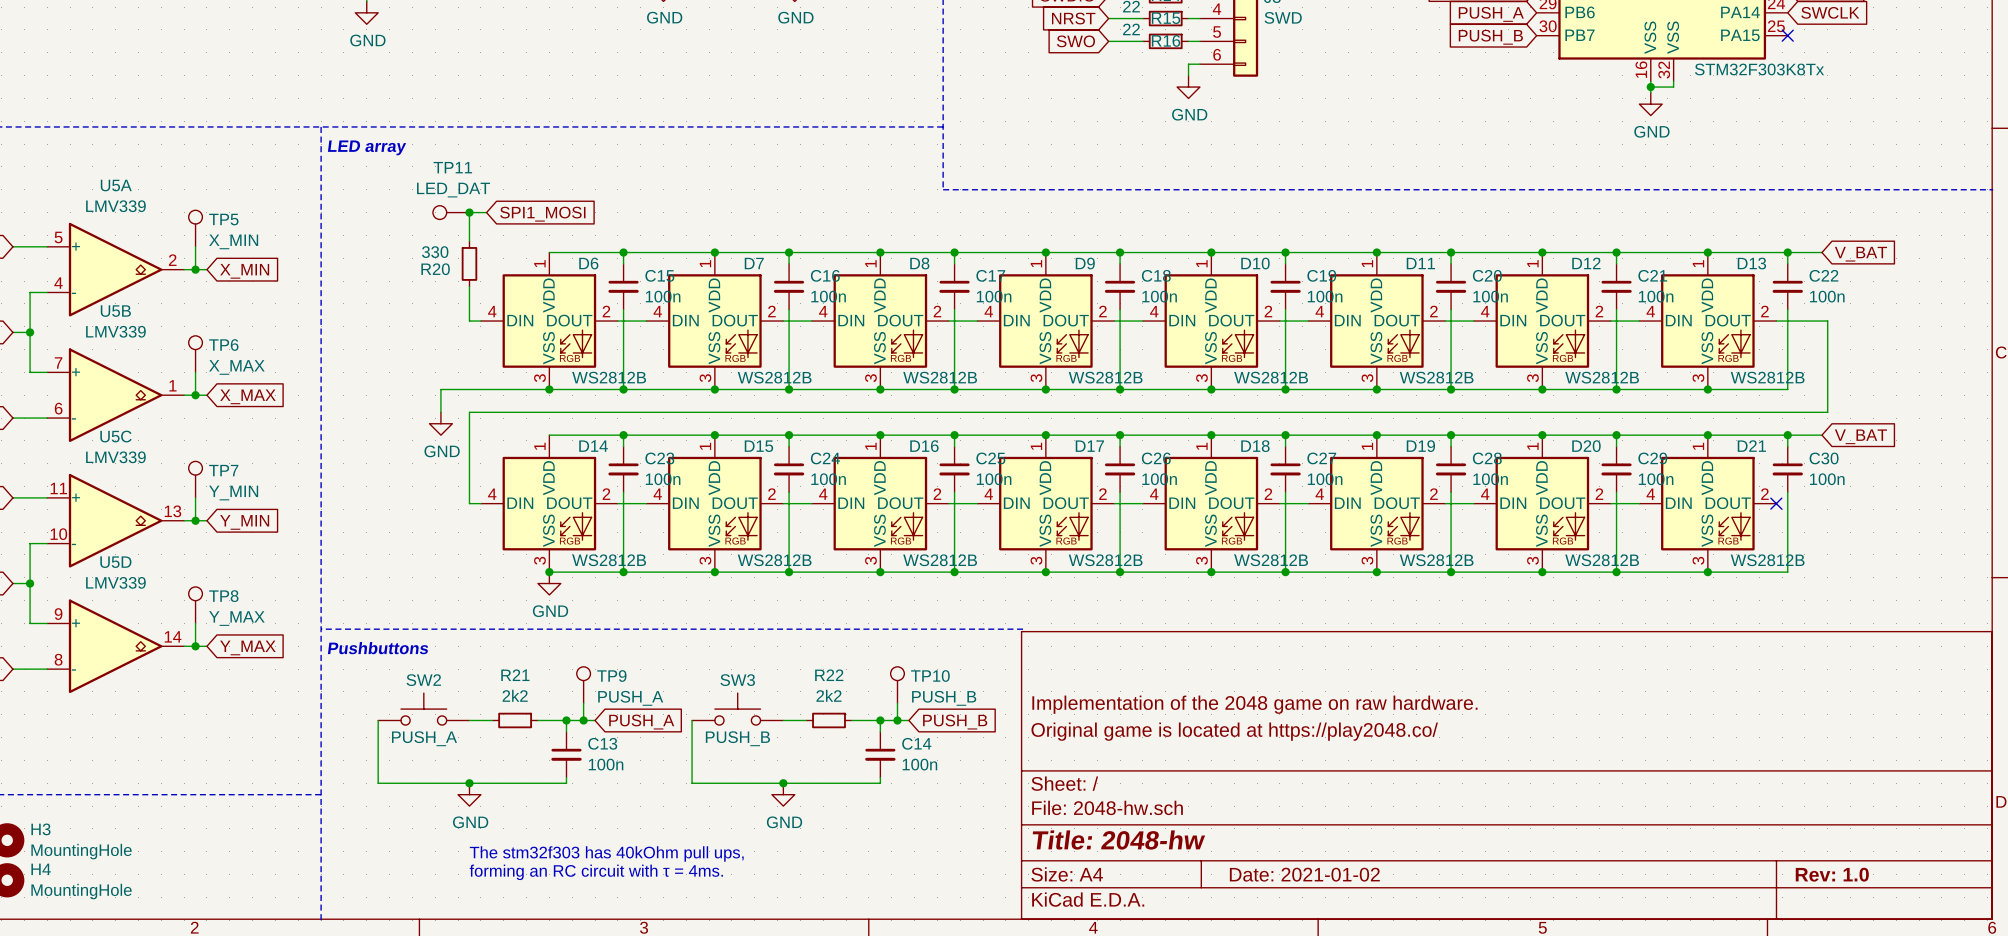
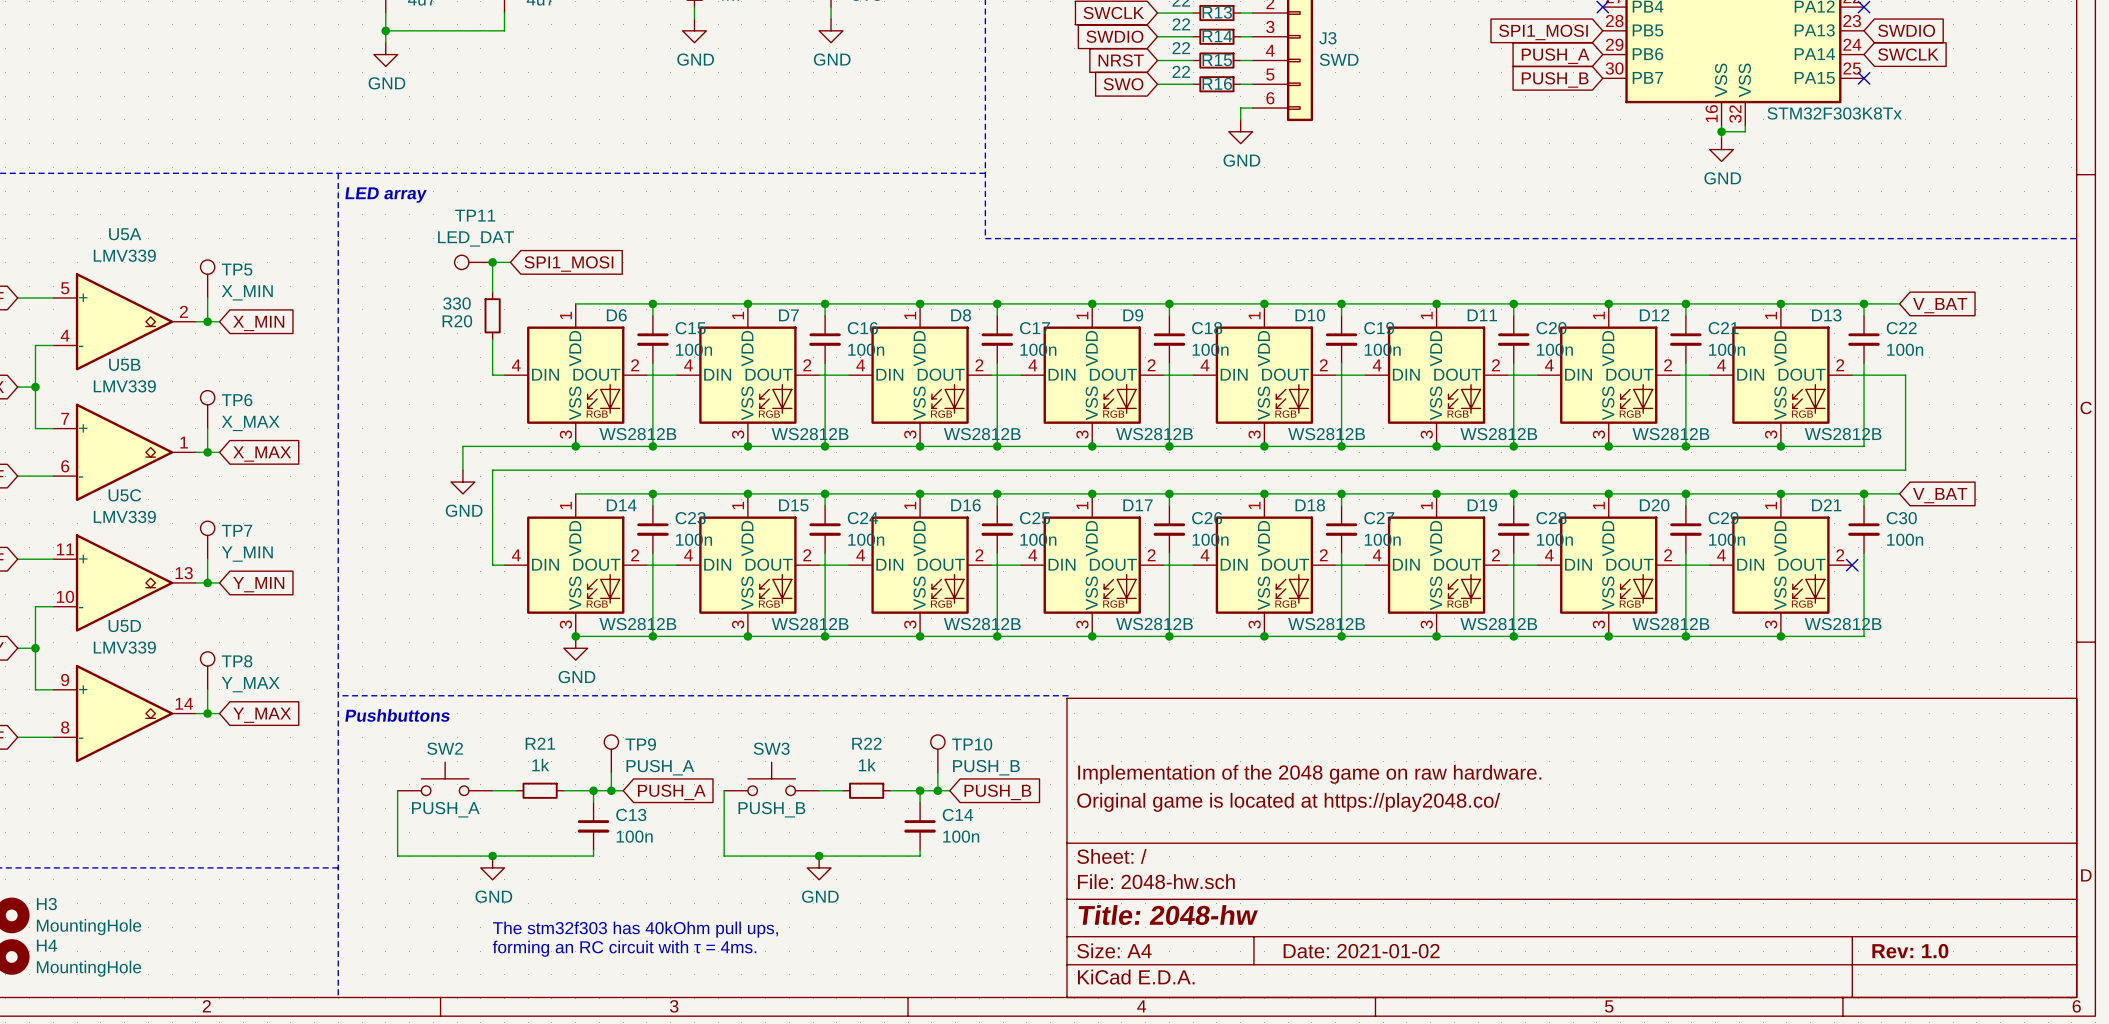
R21 value: 2k2 (515, 695) -> 1k (540, 765)
R22 value: 2k2 (829, 695) -> 1k (867, 765)

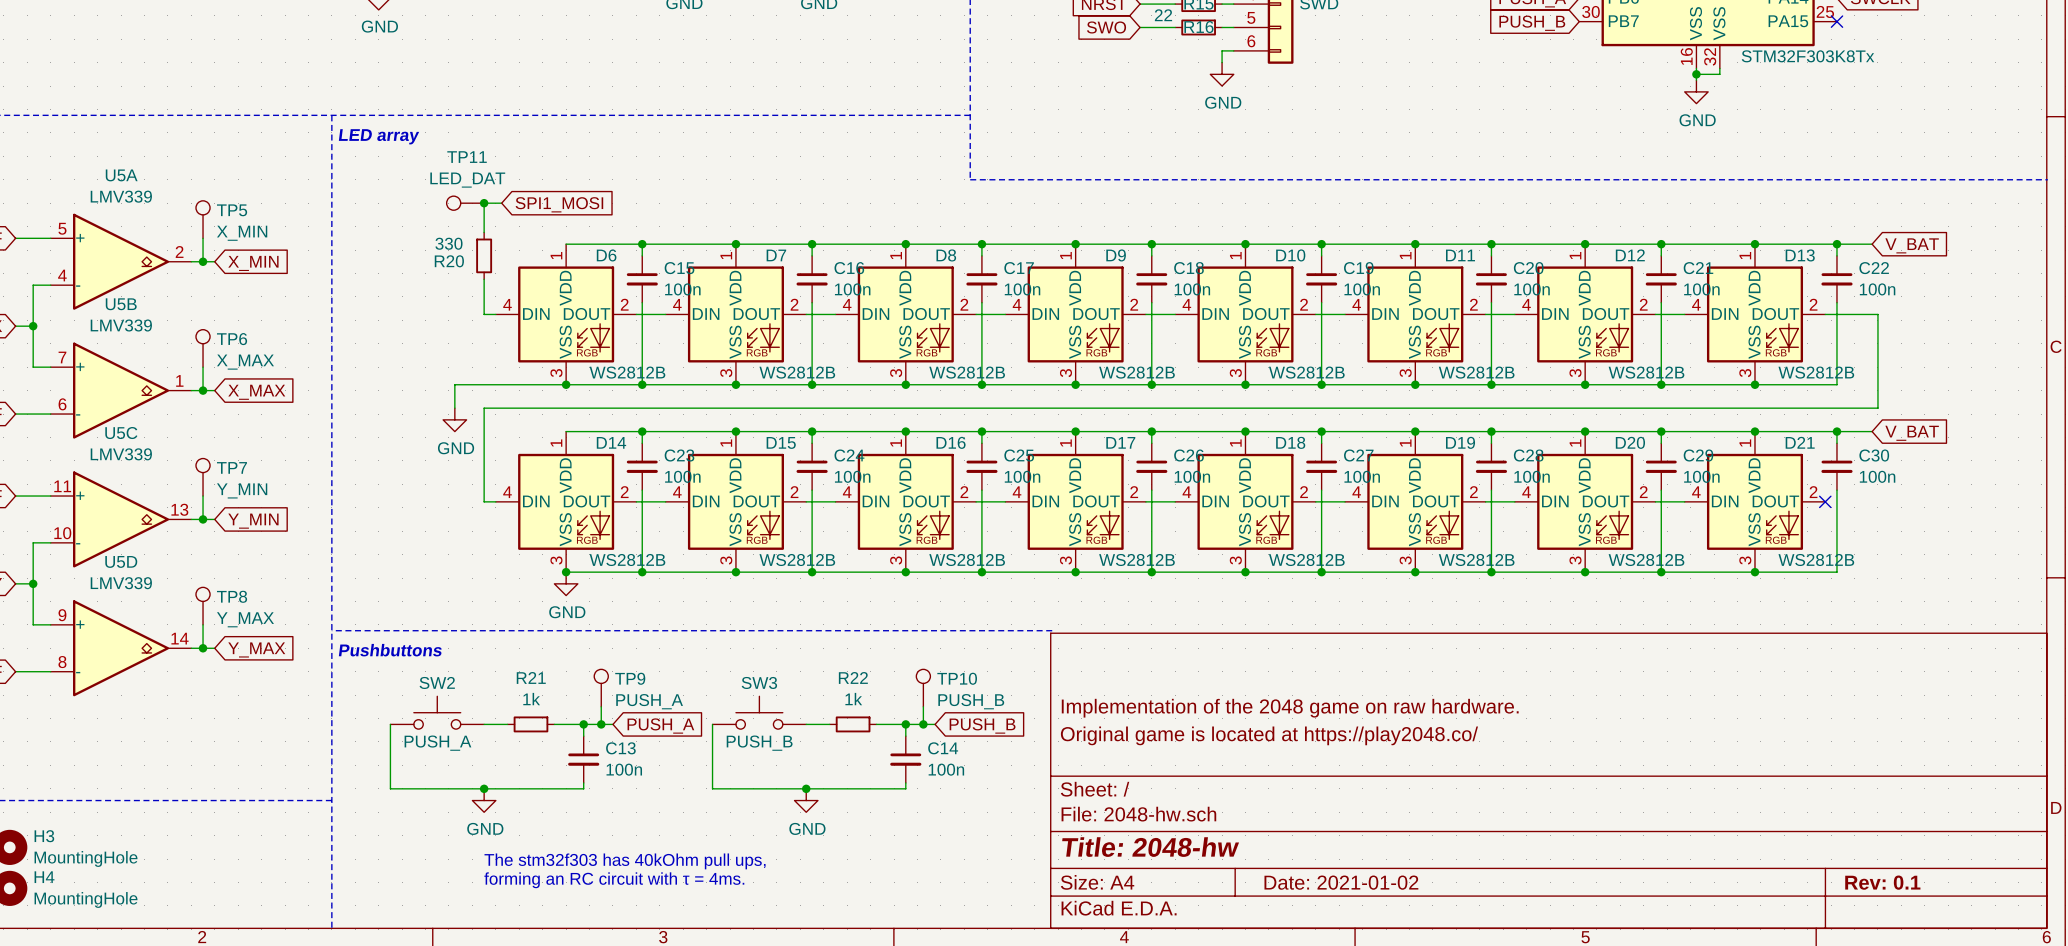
title block: Rev: 1.0 (1910, 951) -> Rev: 0.1 (1882, 882)

